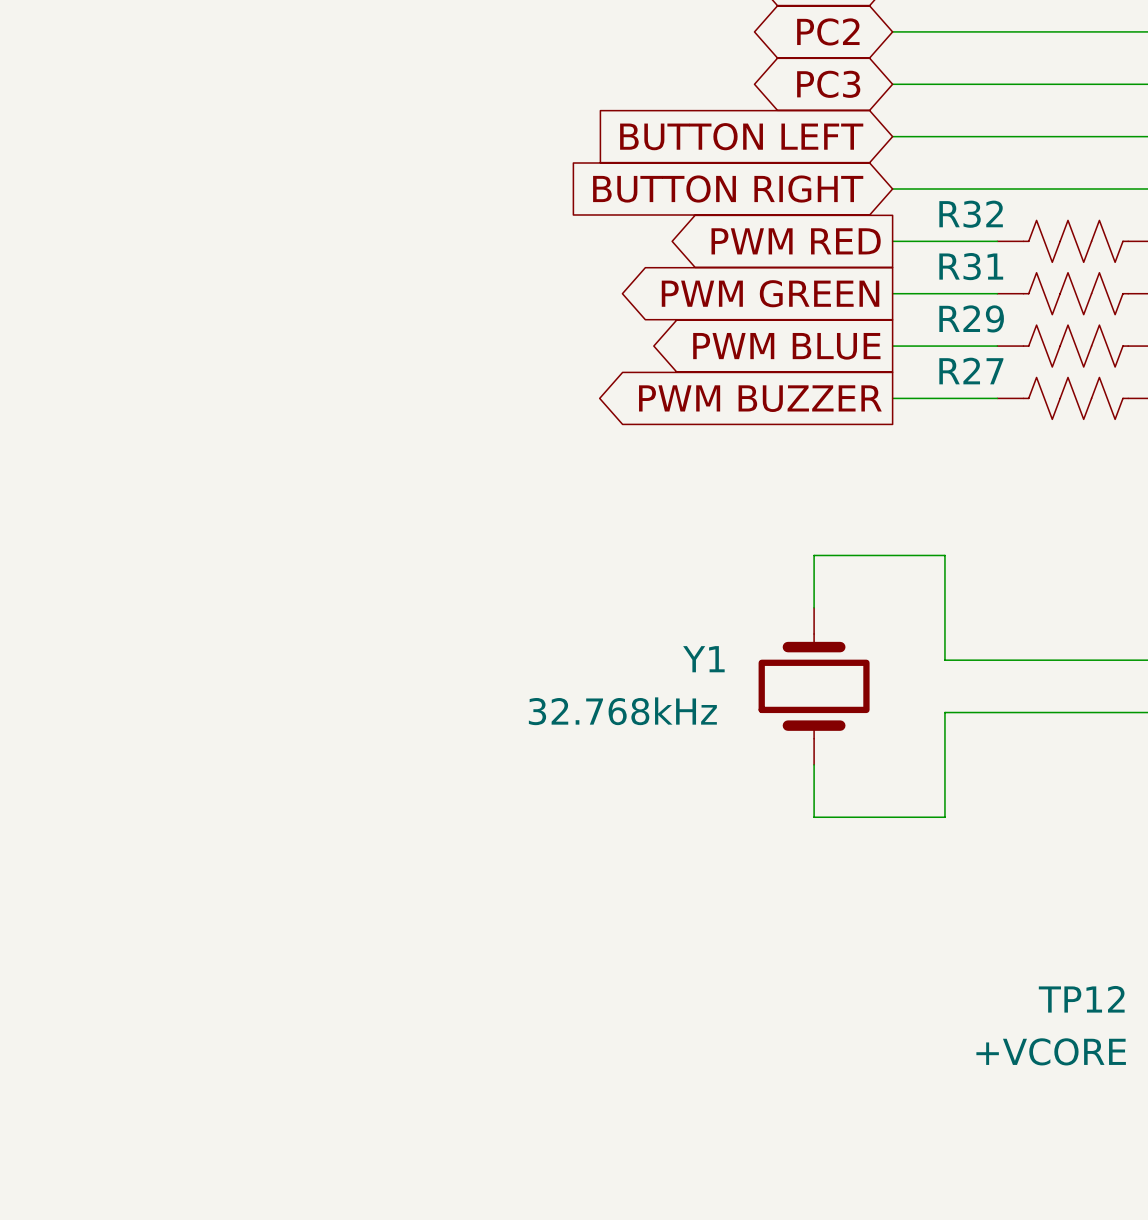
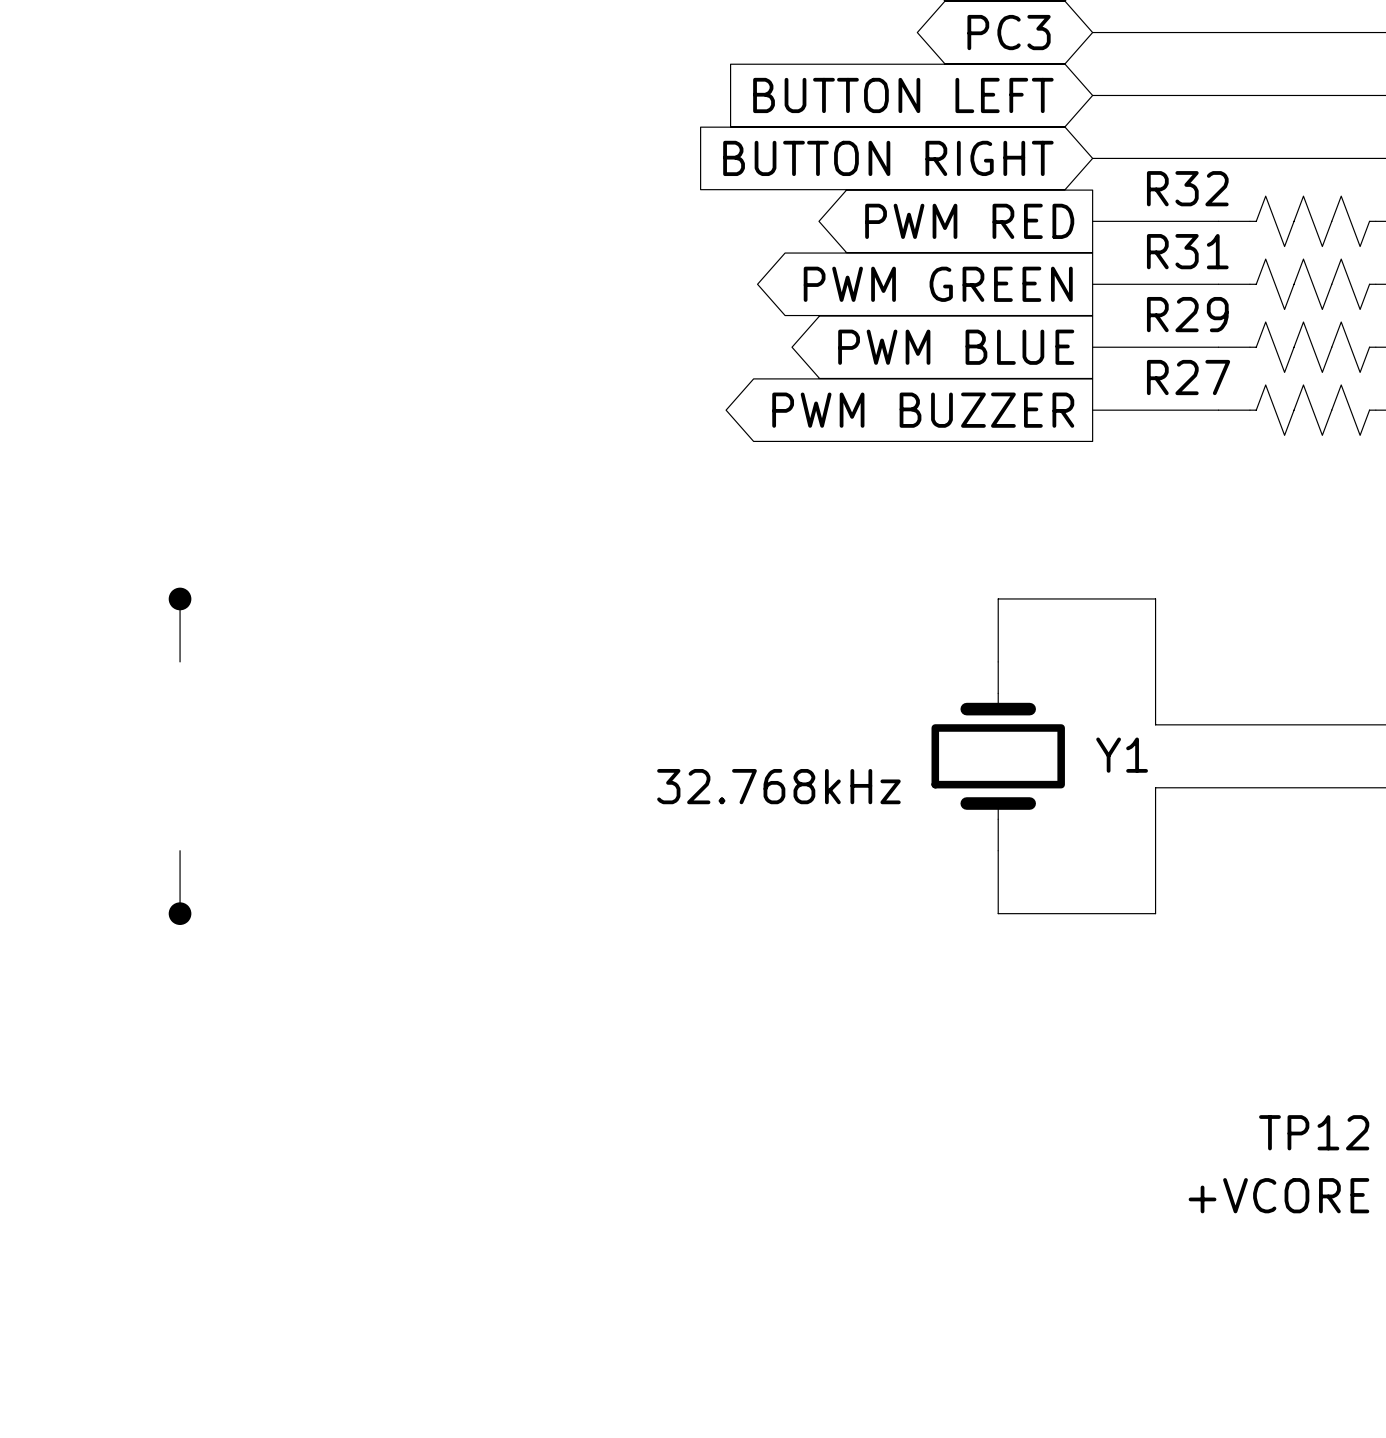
wire: none -> (180, 598) (180, 661)
junction: none -> (180, 598)
Y1 name position: Y1 (703, 659) -> Y1 (1122, 755)
wire: none -> (180, 850) (180, 913)
junction: none -> (180, 913)

